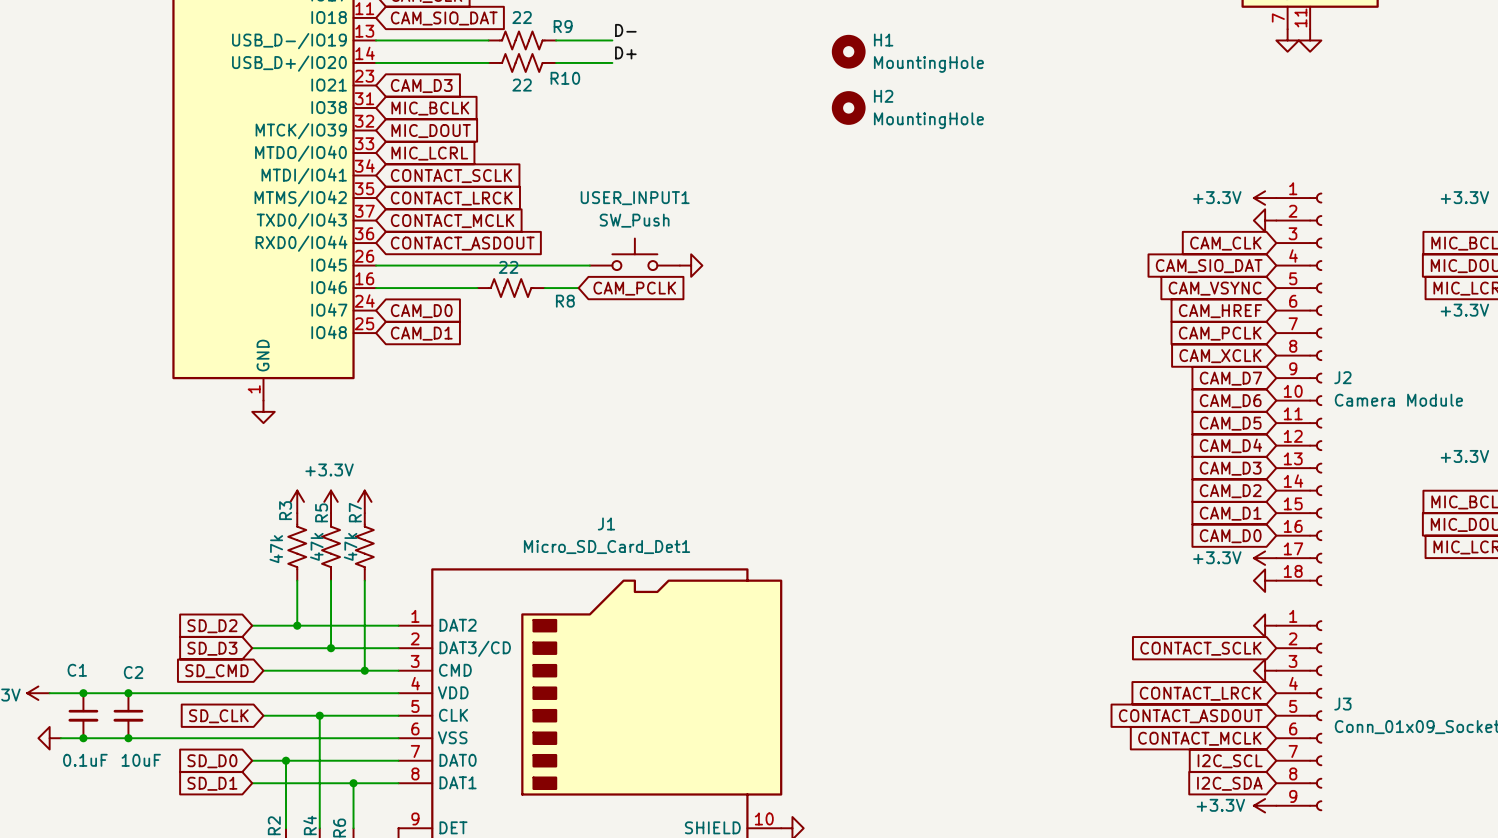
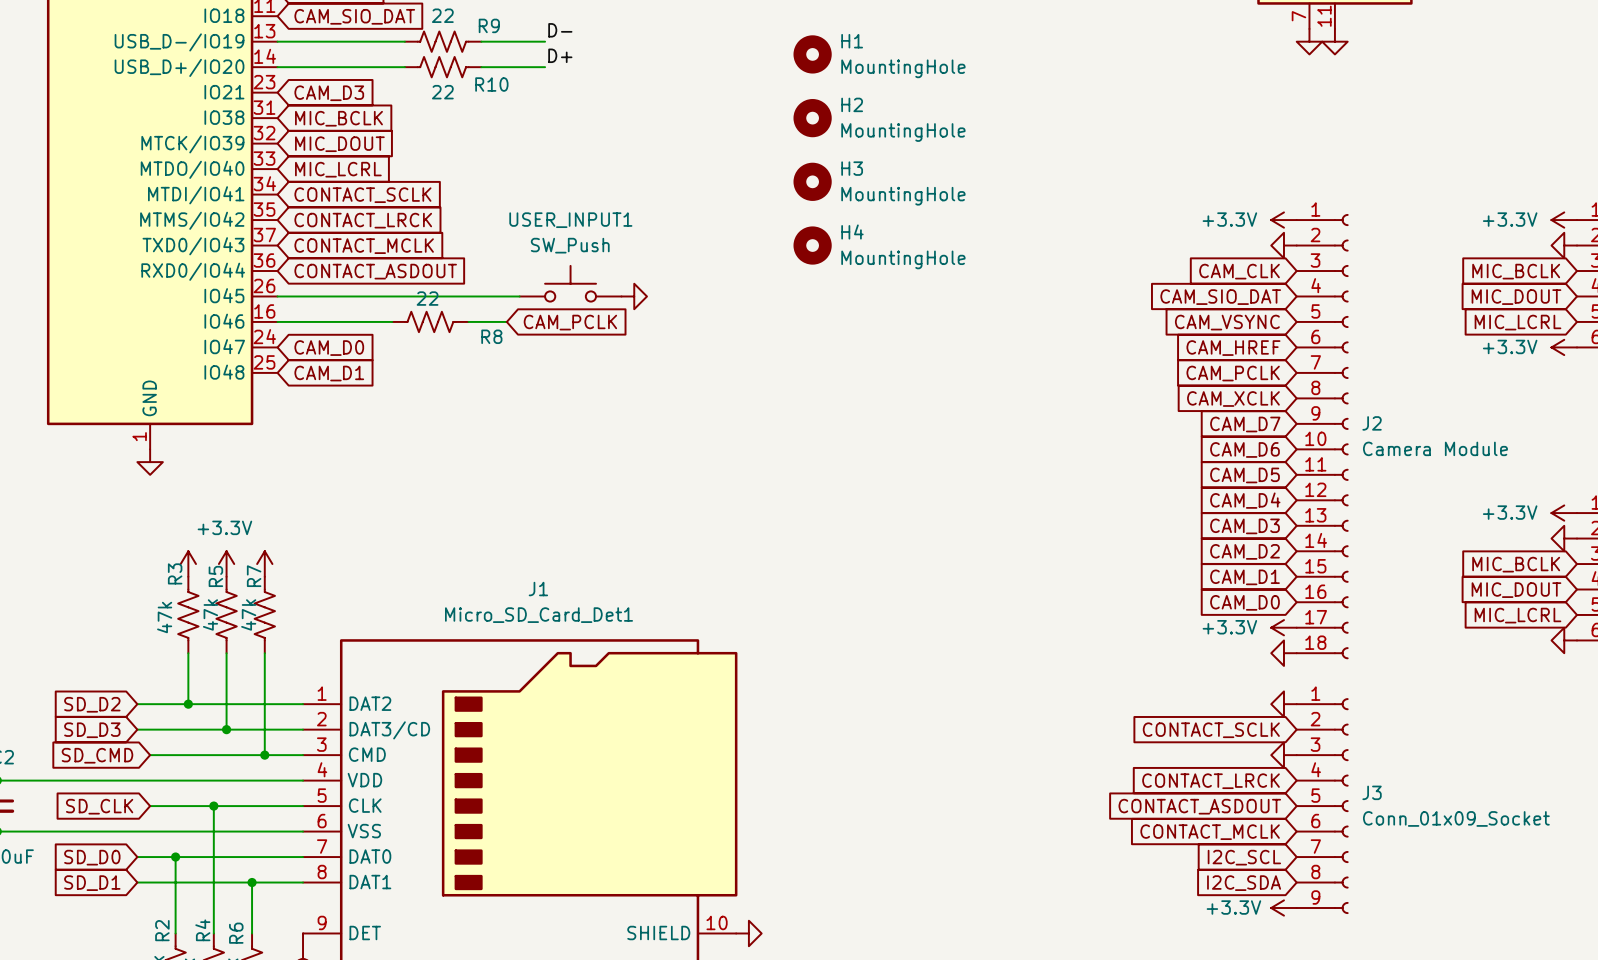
H3: none -> MountingHole (812, 181)
H4: none -> MountingHole (812, 245)

